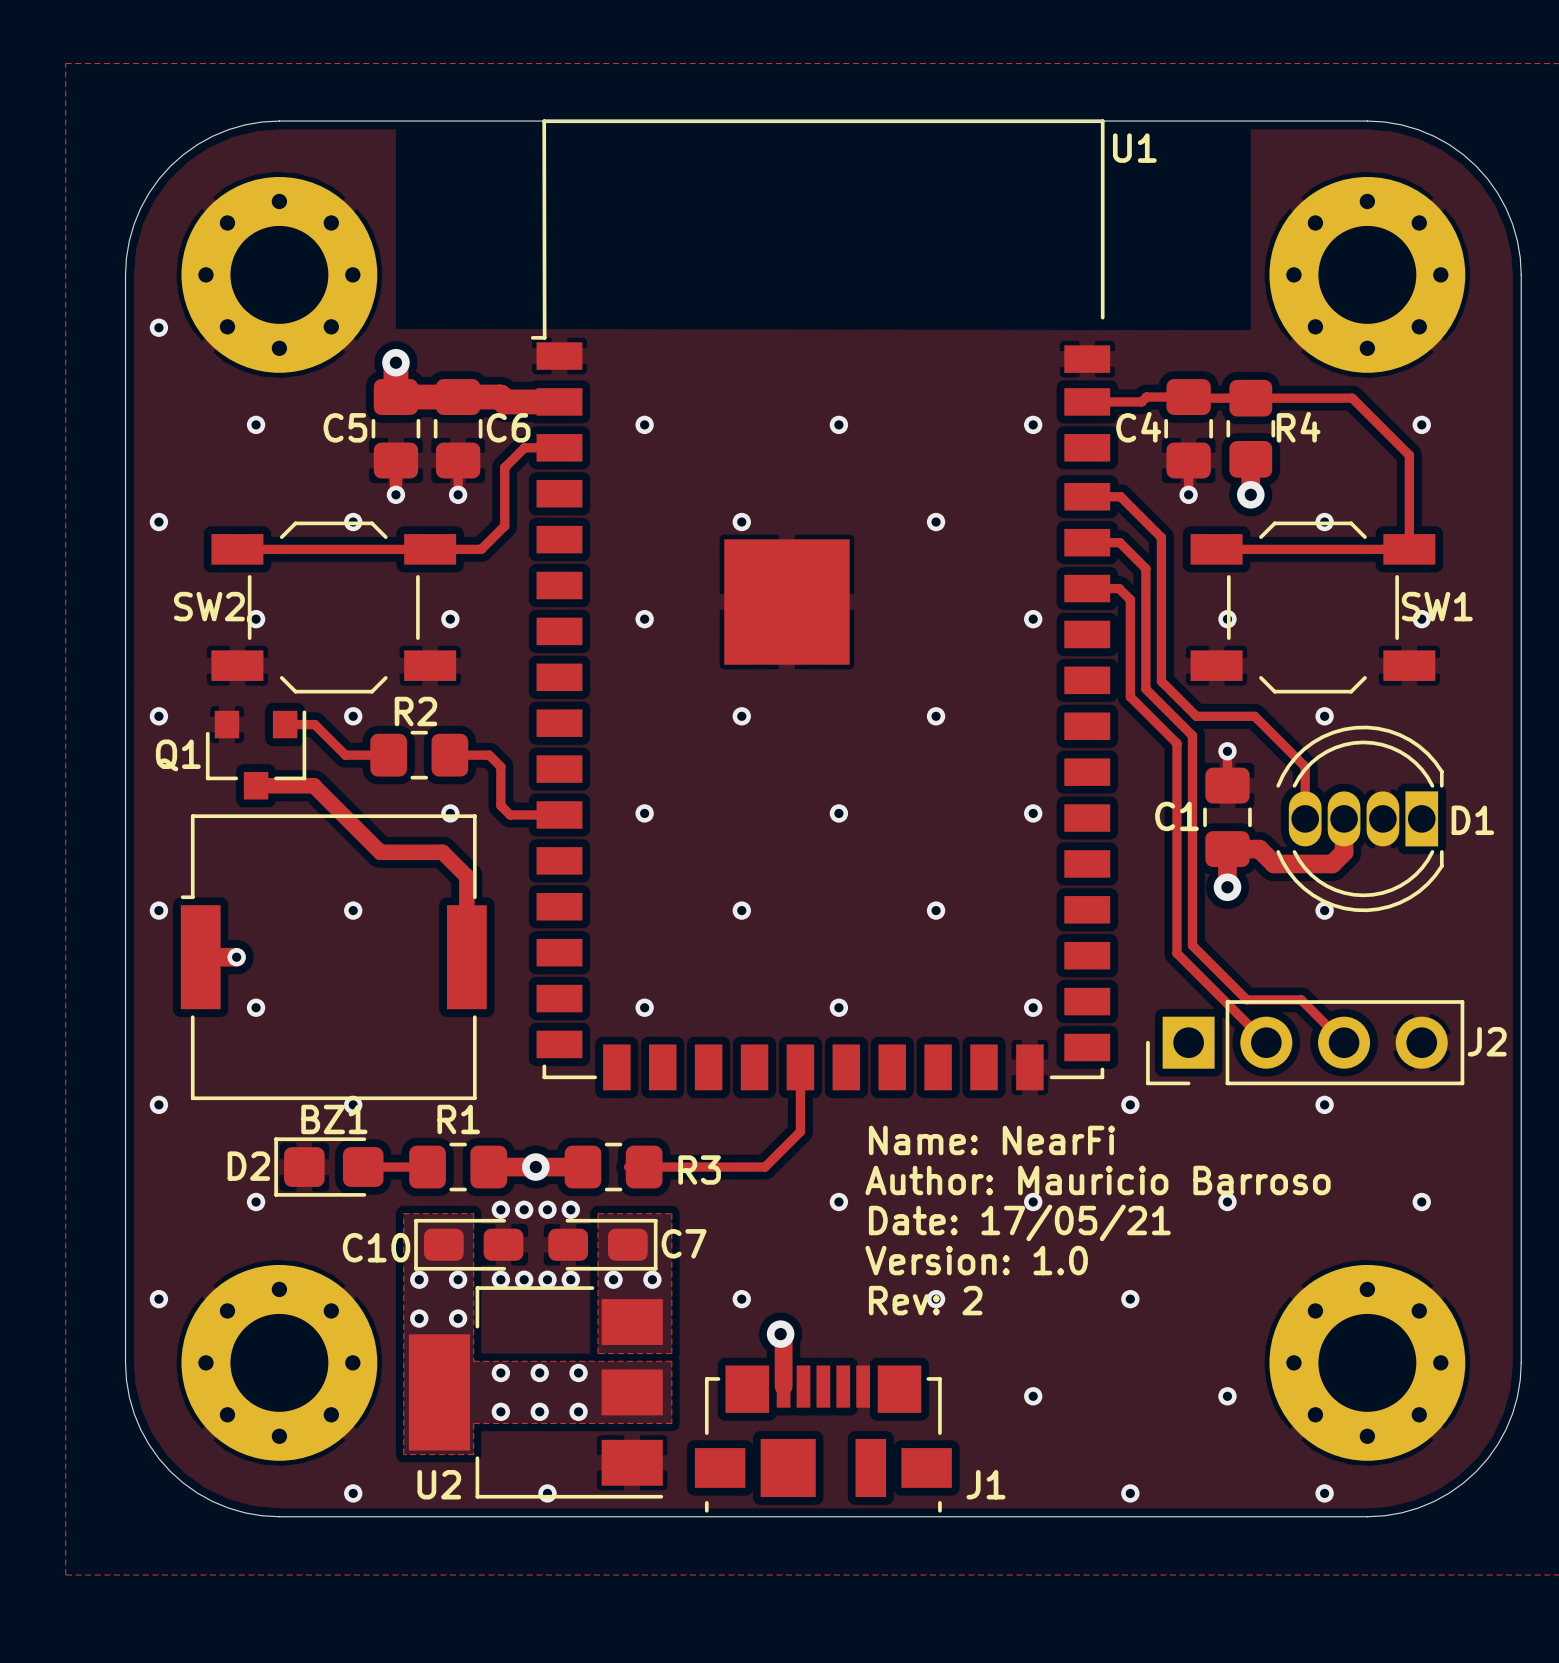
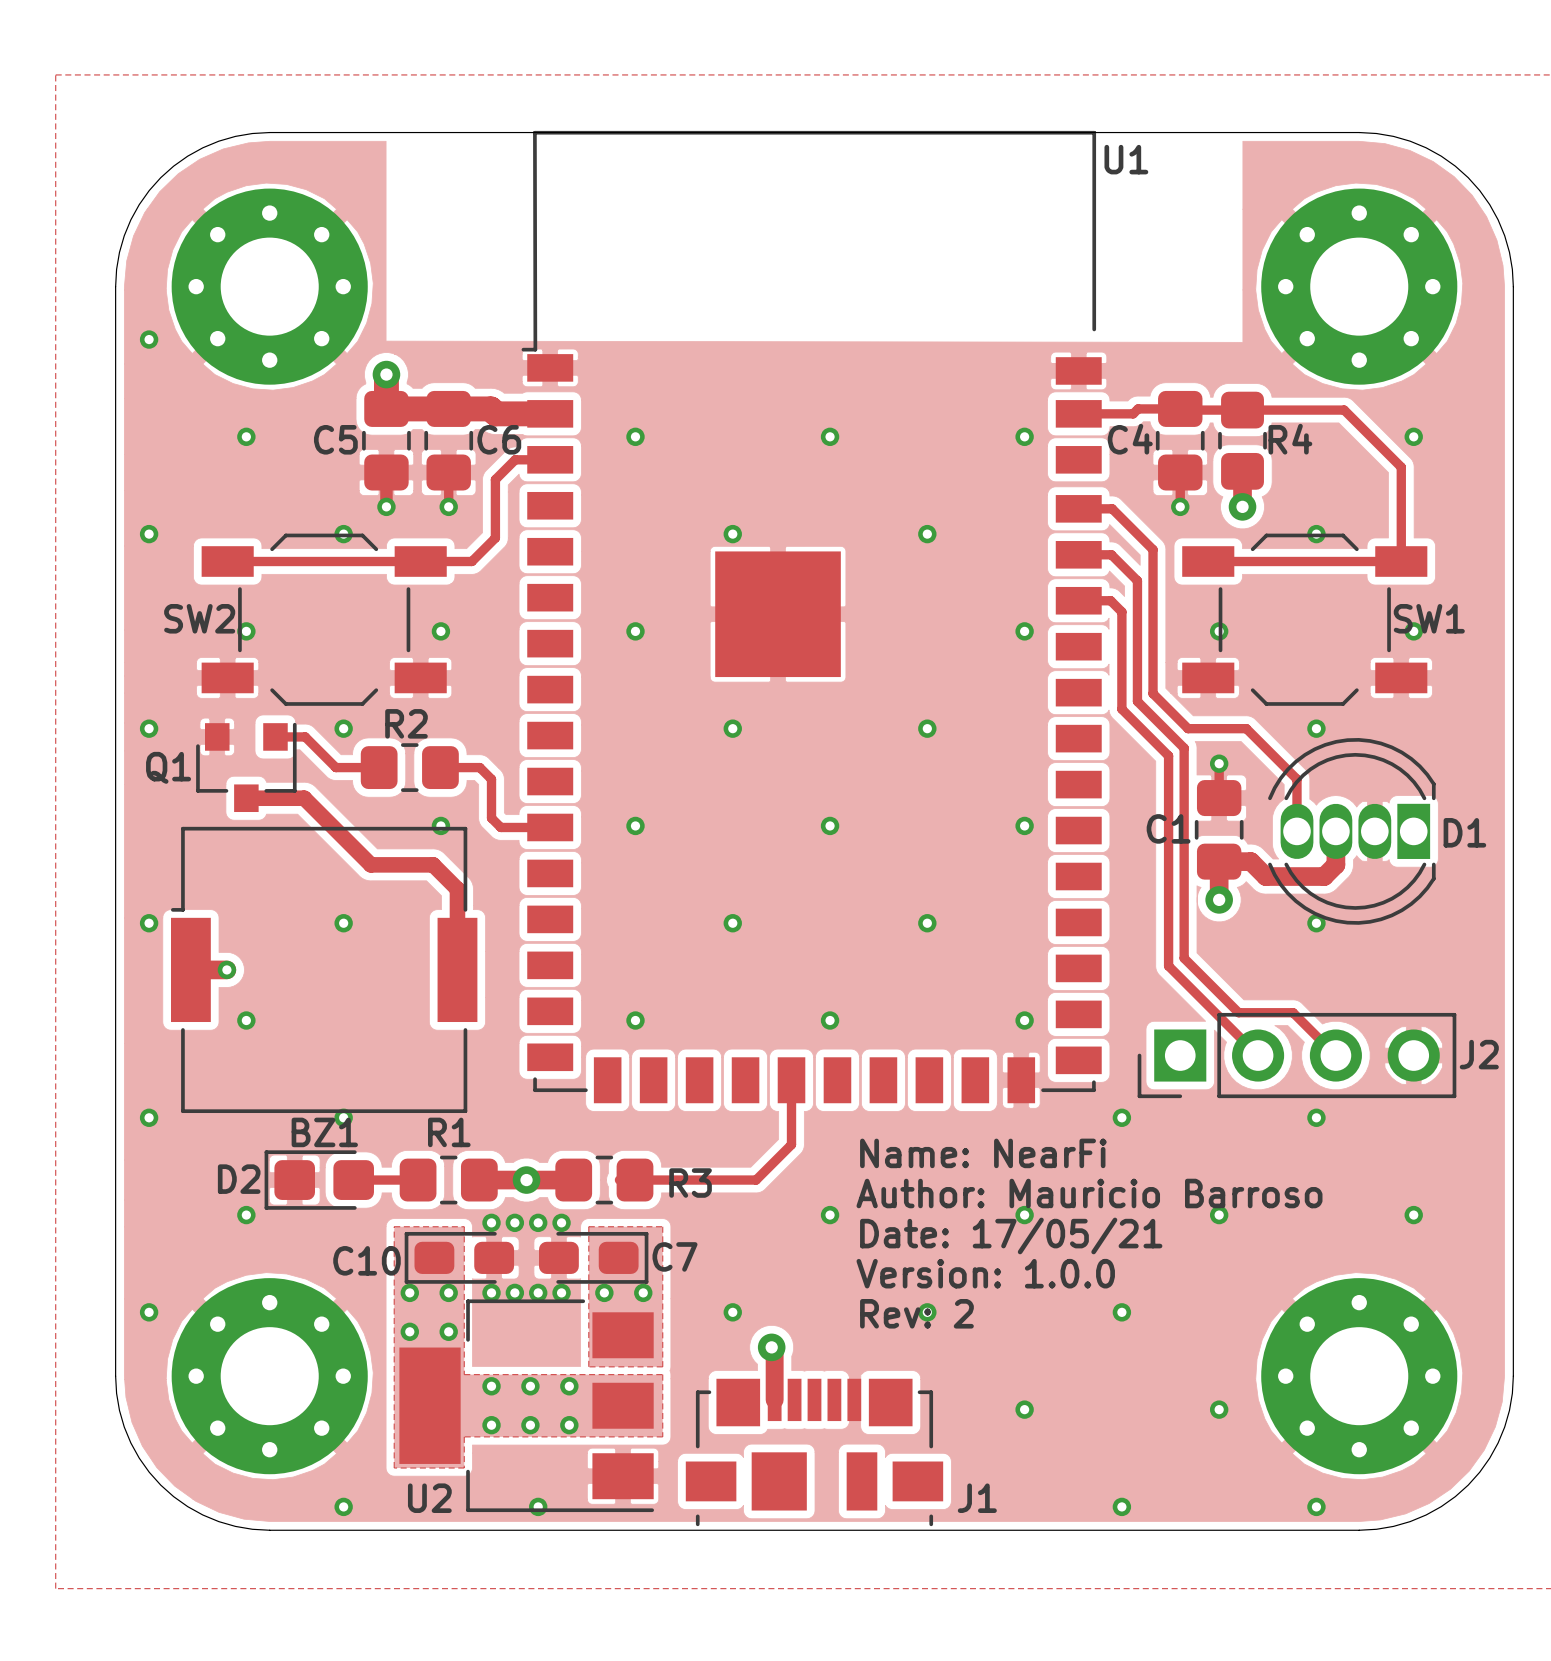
text: Version: 1.0 (976, 1260) -> Version: 1.0.0 (985, 1273)

